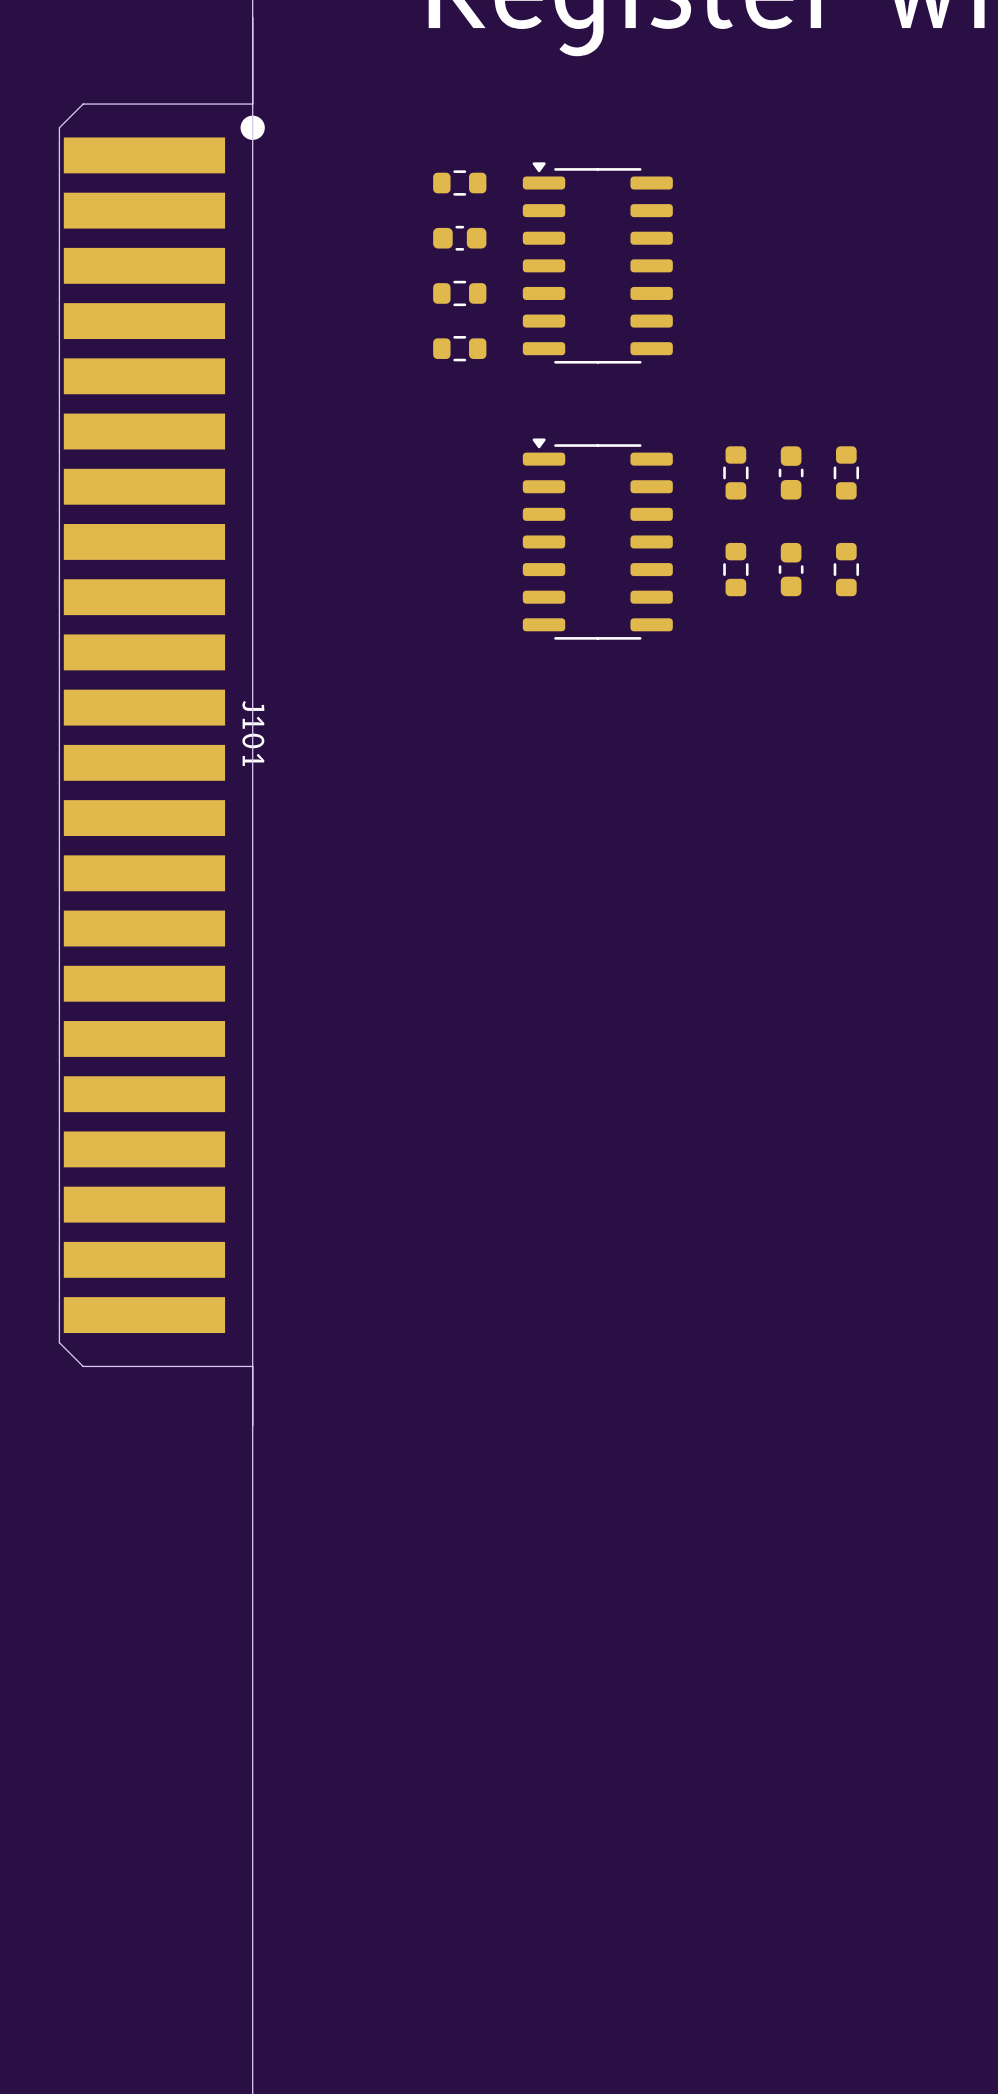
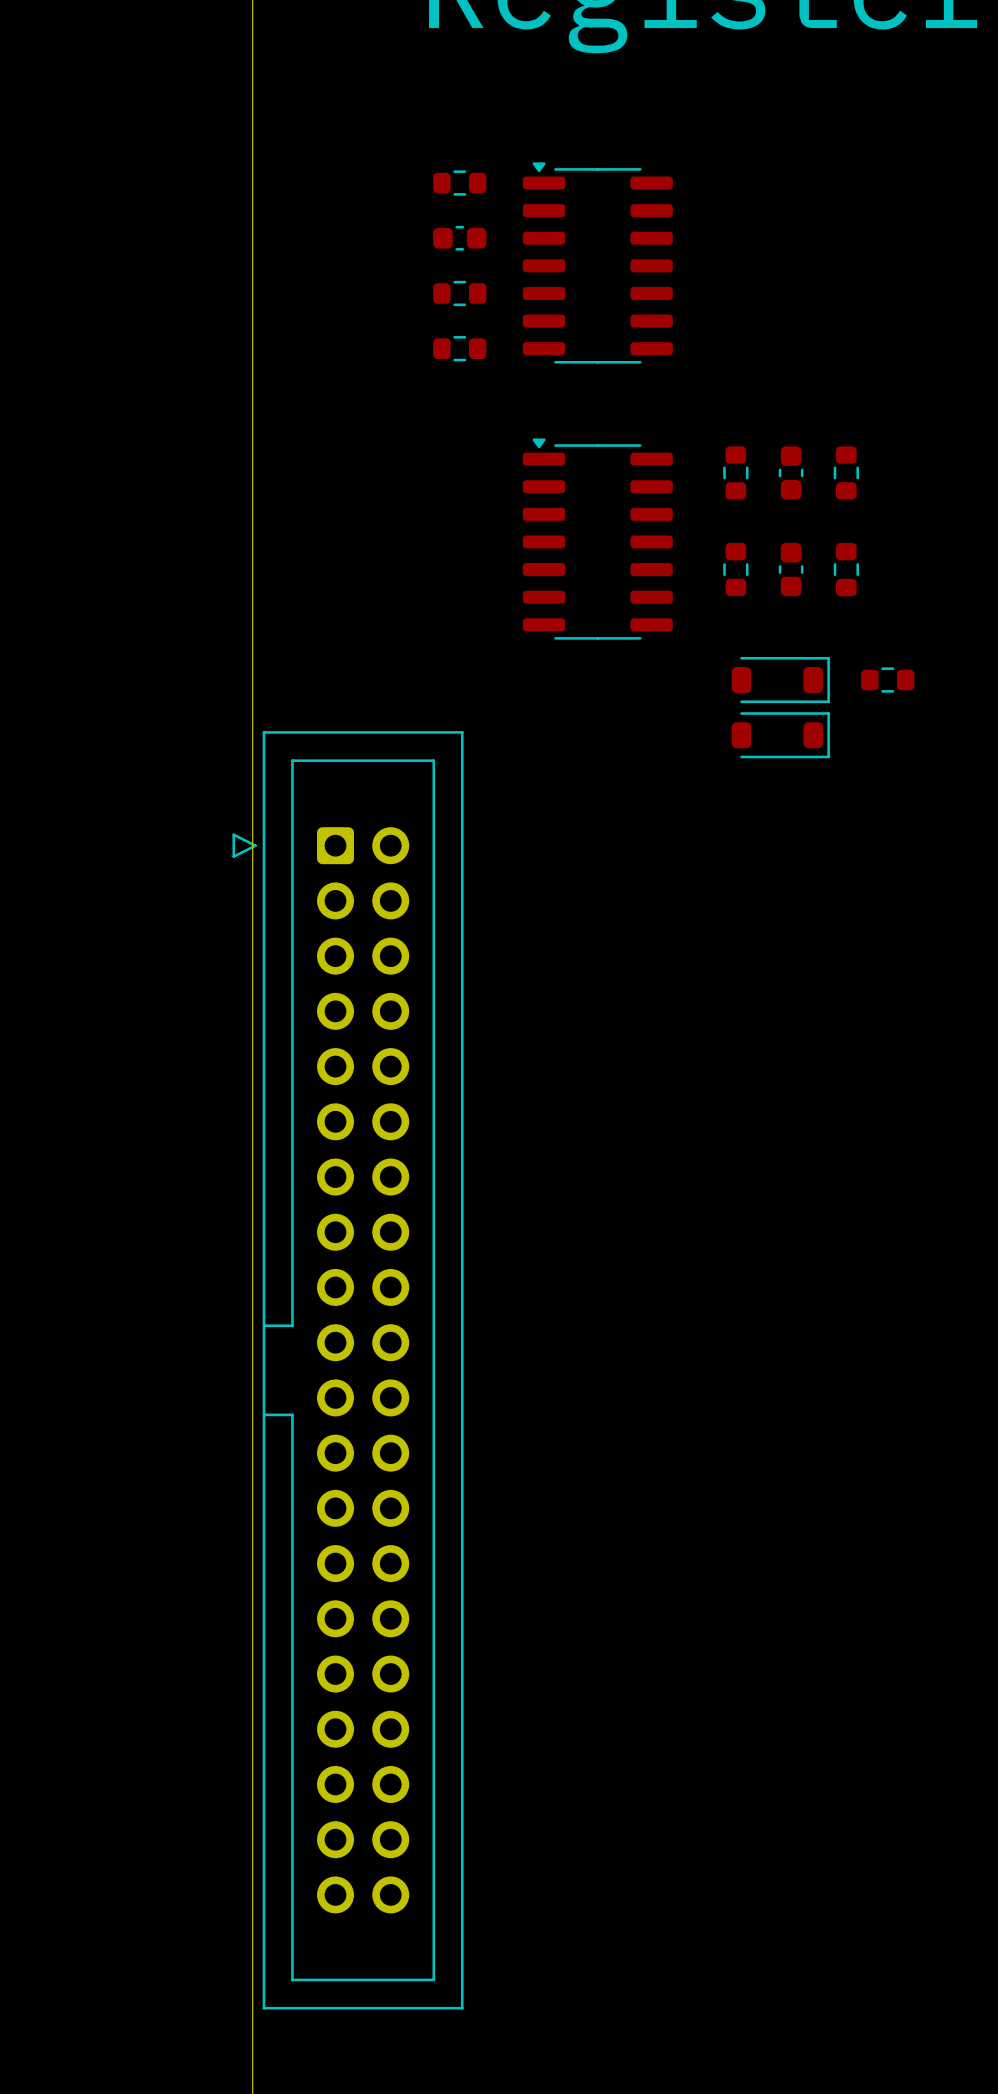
part: none -> (780, 680)
part: none -> (887, 680)
J101: (161, 721) -> none
part: none -> (780, 735)
part: none -> (348, 1370)

